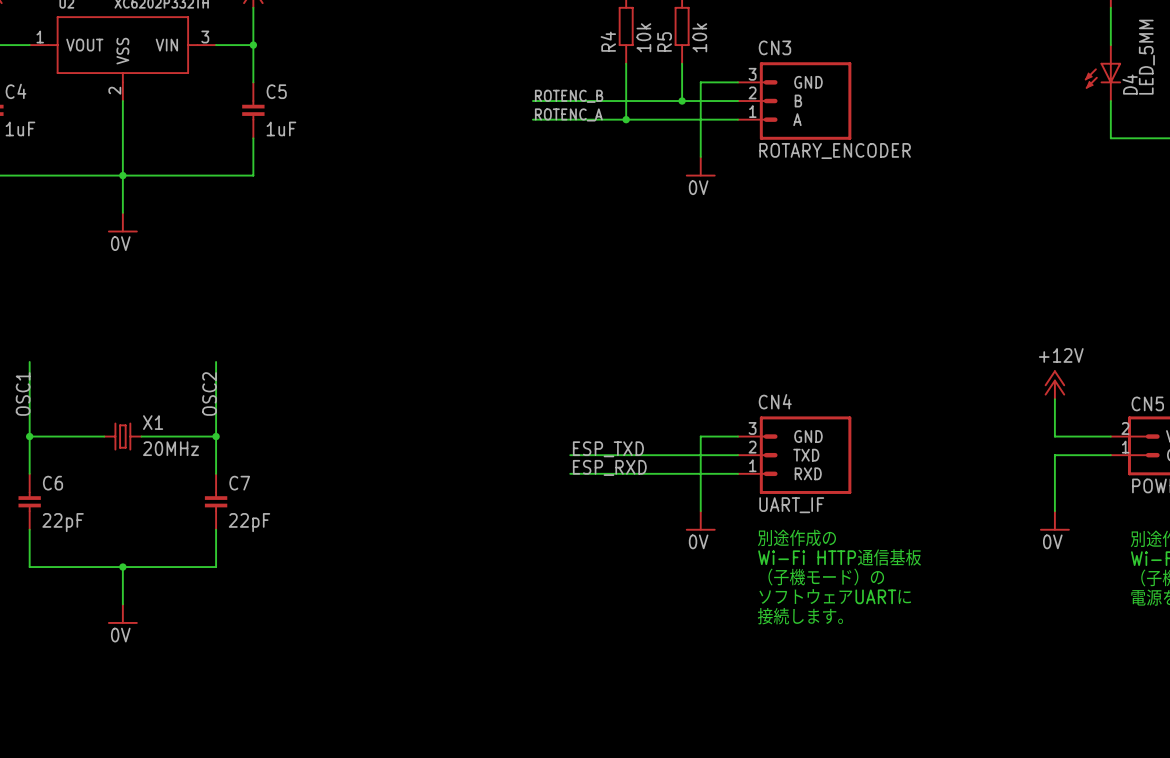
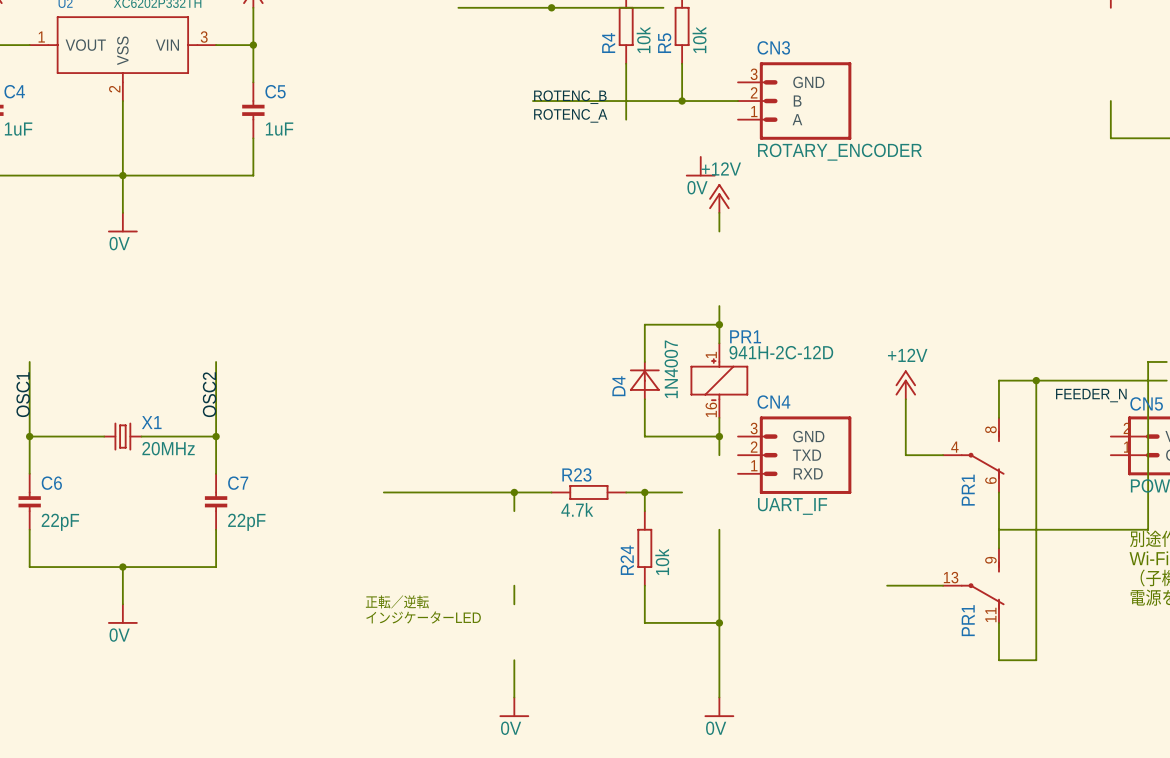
junction: none -> (551, 7)
wire: (1110, 7) (1110, 45) -> none
D4 symbol: [1085, 45, 1122, 102] -> [629, 361, 660, 400]
D4 value: LED_5MM (1146, 57) -> 1N4007 (671, 369)
wire: (738, 82) (700, 82) (700, 156) -> none
D4 name position: D4 (1130, 84) -> D4 (618, 386)
wire: (532, 119) (738, 119) -> (458, 7) (663, 7)
junction: (626, 119) -> none
power symbol: none -> +12V (719, 198)
wire: none -> (719, 212) (719, 231)
wire: none -> (719, 306) (719, 343)
wire: none -> (719, 324) (644, 324) (644, 361)
junction: none -> (719, 324)
wire: none -> (1166, 361) (1148, 361) (1148, 529) (998, 529)
PR1: none -> 941H-2C-12D (719, 380)
wire: none -> (1036, 380) (1036, 660) (998, 660) (998, 622)
junction: none -> (1036, 380)
wire: none -> (1166, 380) (998, 380) (998, 417)
power symbol position: +12V (1054, 384) -> +12V (905, 384)
label: none -> FEEDER_N (1091, 395)
wire: none -> (905, 399) (905, 455) (943, 455)
wire: (1054, 399) (1054, 436) (1110, 436) -> none
wire: none -> (719, 417) (719, 455)
wire: (700, 436) (700, 511) -> (700, 436) (644, 436) (644, 399)
wire: (719, 436) (738, 436) -> none
junction: none -> (719, 436)
label: ESP_TXD (608, 449) -> none
wire: (570, 455) (738, 455) -> none
PR1: none -> (973, 455)
wire: (1110, 455) (1054, 455) (1054, 511) -> none
label: ESP_RXD (609, 467) -> none
wire: (570, 473) (738, 473) -> none
wire: none -> (383, 492) (551, 492)
wire: none -> (514, 492) (514, 511)
junction: none -> (514, 492)
R23: none -> 4.7k (588, 492)
wire: none -> (626, 492) (682, 492)
wire: none -> (644, 492) (644, 511)
junction: none -> (644, 492)
wire: none -> (998, 492) (998, 548)
power symbol: 0V (700, 520) -> none
power symbol: 0V (1054, 520) -> none
wire: none -> (719, 529) (719, 697)
text: 別途作成の (796, 537) -> none
R24: none -> 10k (644, 548)
text: Wi-Fi HTTP通信基板 (840, 557) -> none
text: （子機モード）の (826, 577) -> none
wire: none -> (514, 585) (514, 604)
wire: none -> (644, 585) (644, 622) (719, 622)
wire: none -> (887, 585) (943, 585)
PR1: none -> (973, 585)
text: ソフトウェアUARTに (835, 596) -> none
text: none -> 正転／逆転 (397, 601)
text: 接続します。 (800, 616) -> none
text: none -> インジケーターLED (423, 617)
junction: none -> (719, 622)
wire: none -> (514, 660) (514, 697)
power symbol: none -> 0V (514, 707)
power symbol: none -> 0V (719, 707)

